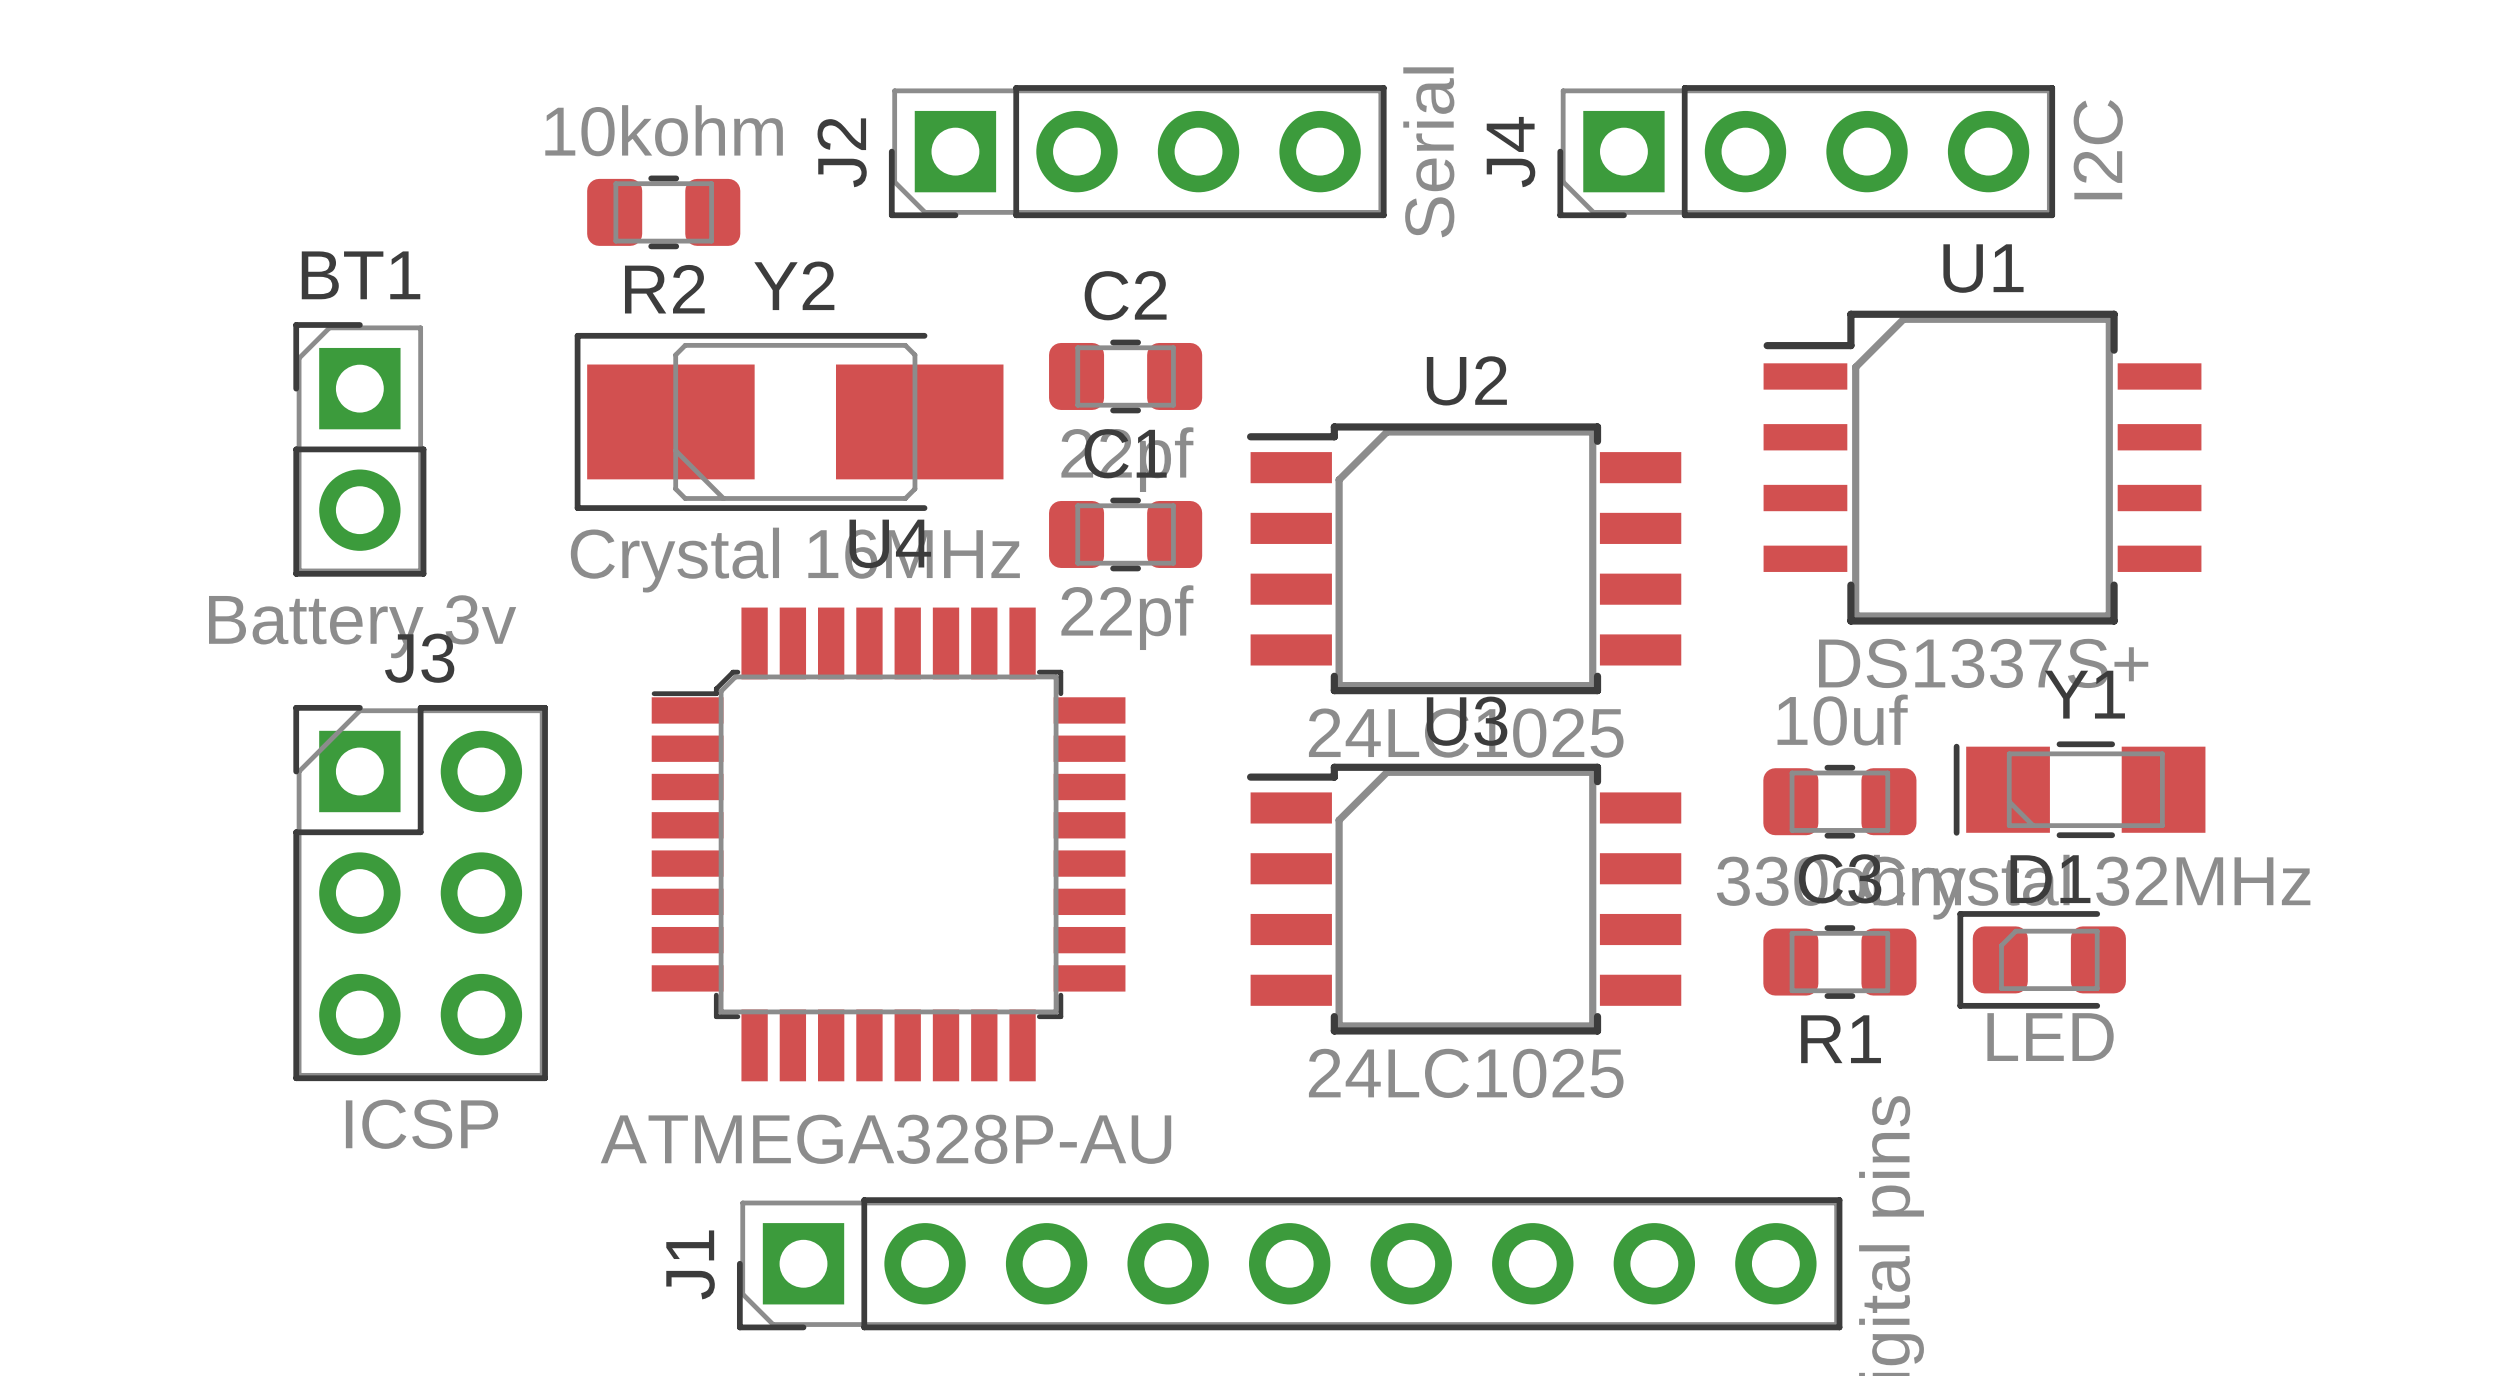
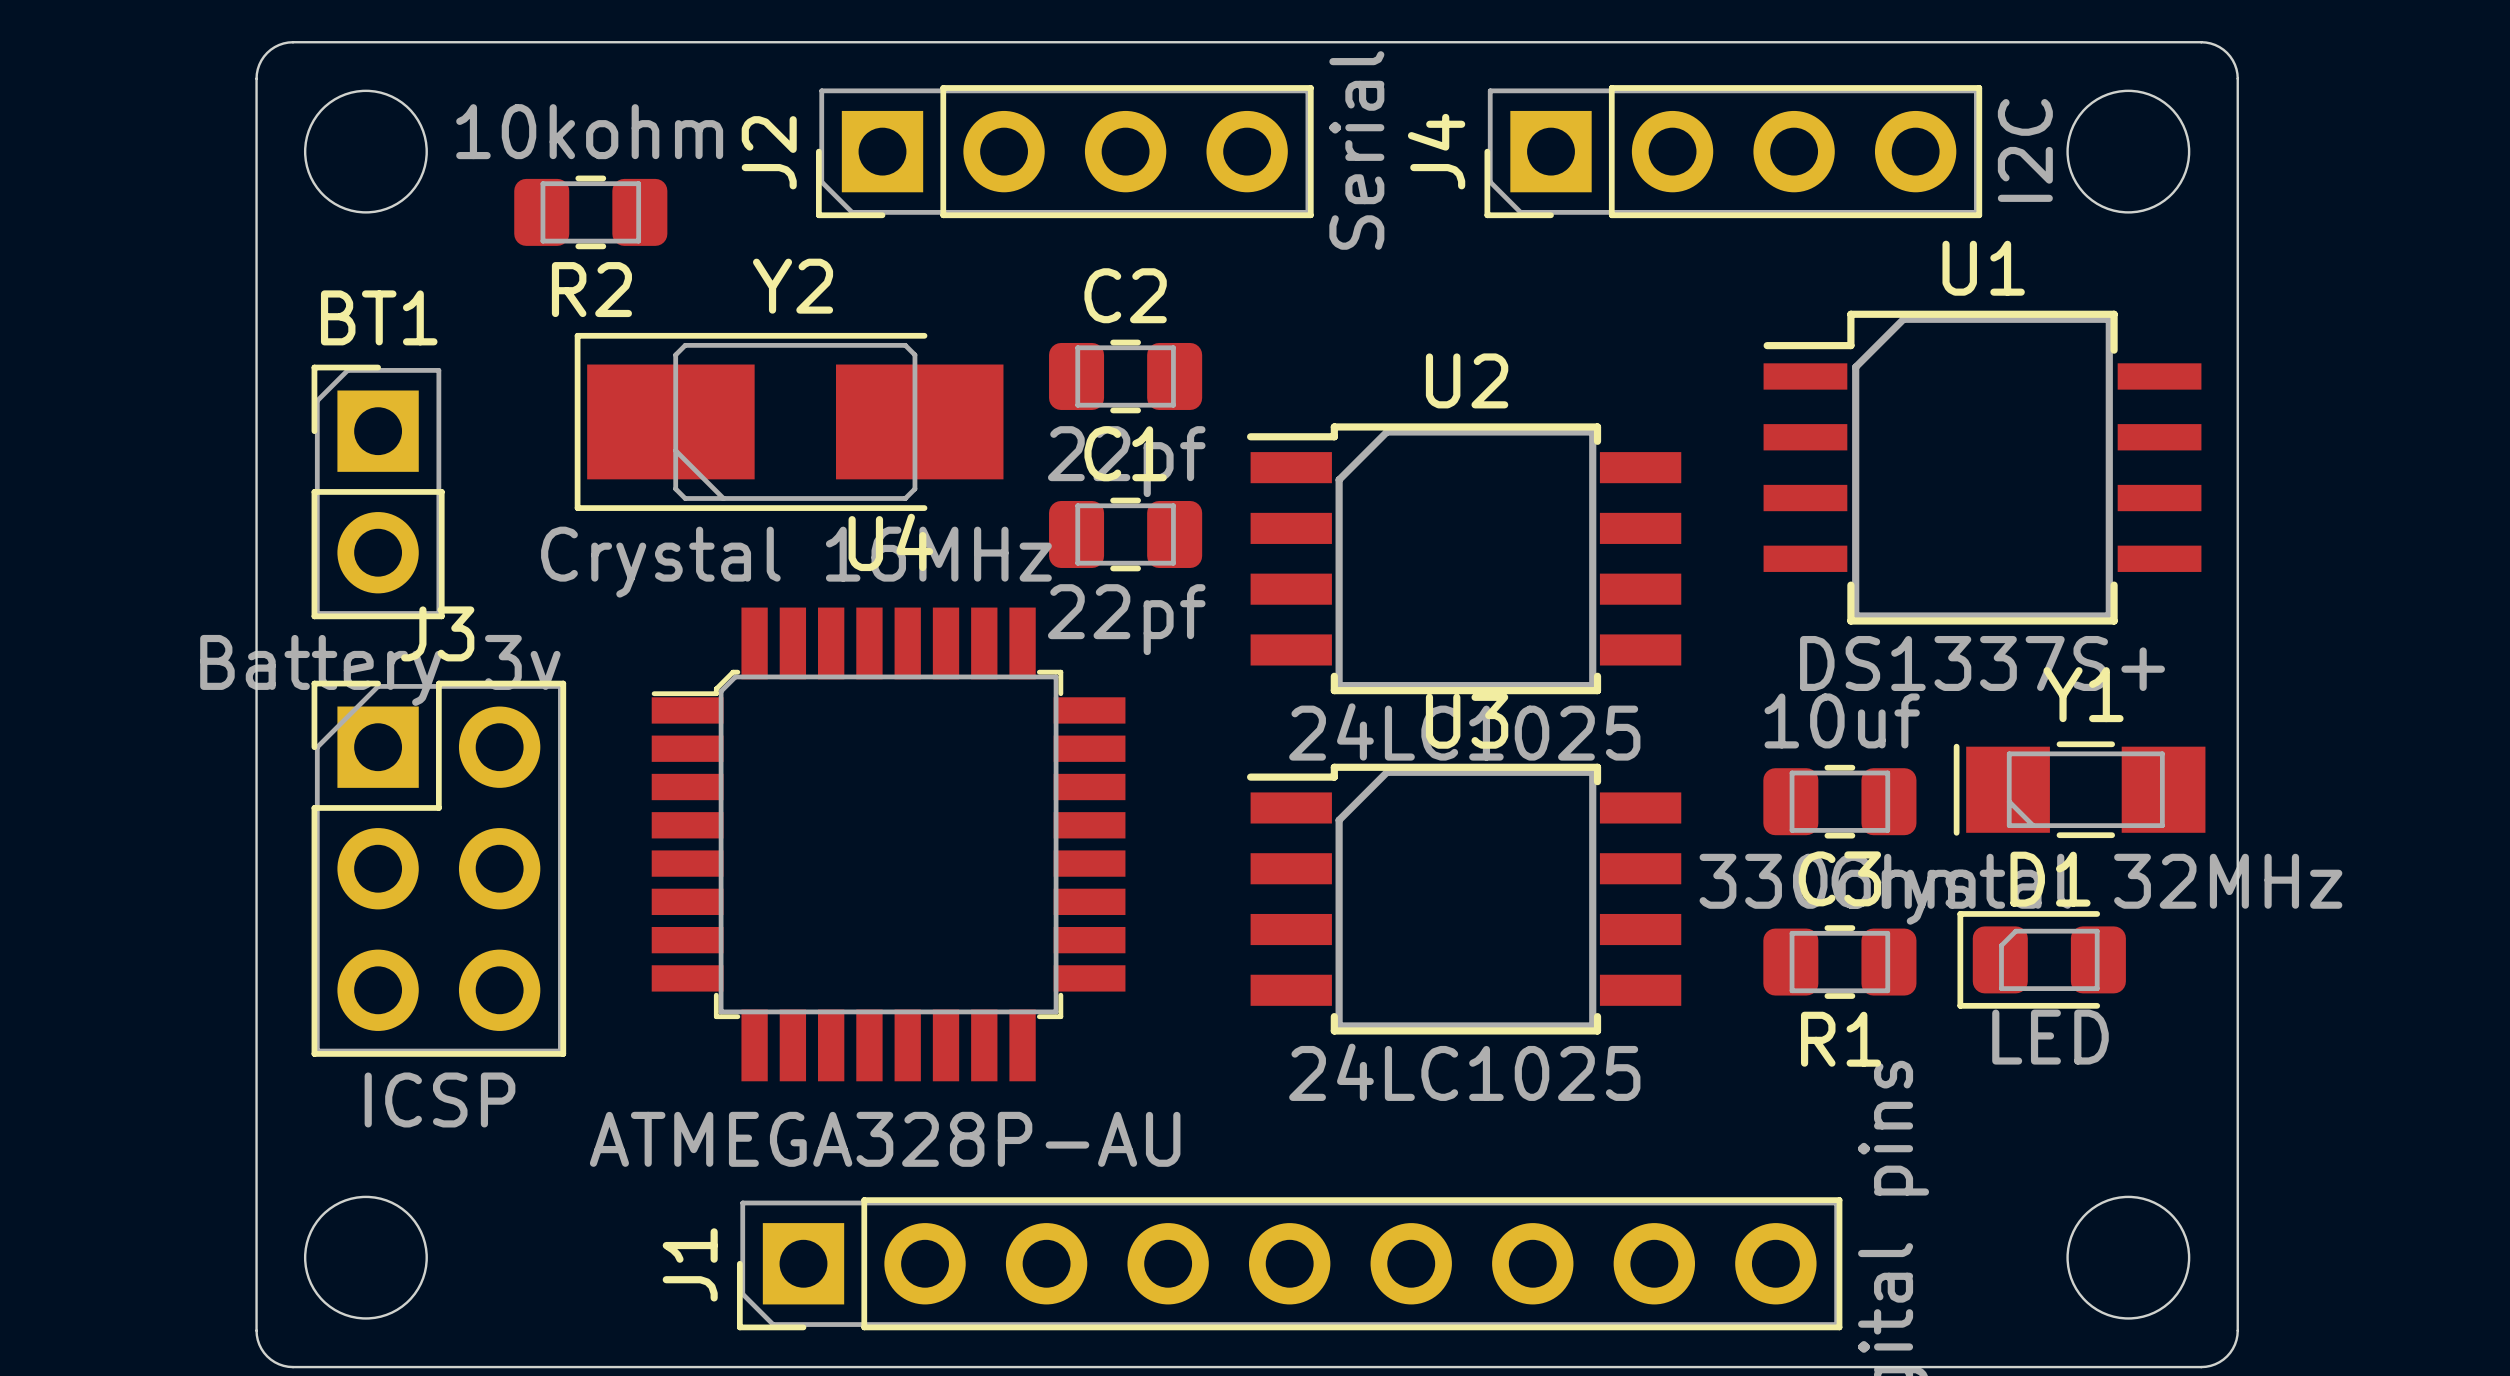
board edge: none -> (293, 42) (2201, 42) (2215, 45) (2223, 49) (2234, 64) (2237, 78) (2237, 1330) (2234, 1344) (2230, 1352) (2215, 1364) (2201, 1367) (293, 1367) (279, 1364) (270, 1359) (259, 1344) (256, 1330) (256, 78) (259, 64) (267, 52) (279, 45) (293, 42)
round board edge: none -> [303, 89, 428, 214]
round board edge: none -> [2066, 89, 2191, 214]
J2 position: (1137, 151) -> (1064, 151)
J4 position: (1806, 151) -> (1733, 151)
R2 position: (663, 212) -> (590, 212)
BT1 position: (359, 449) -> (378, 491)
J3 position: (420, 893) -> (438, 868)
round board edge: none -> [303, 1195, 428, 1320]
round board edge: none -> [2066, 1195, 2191, 1320]

